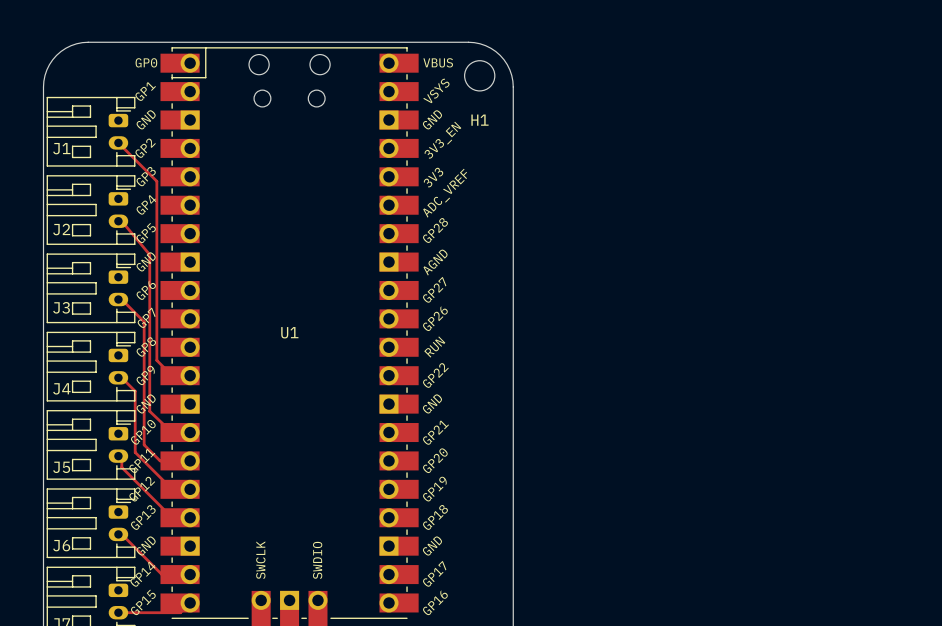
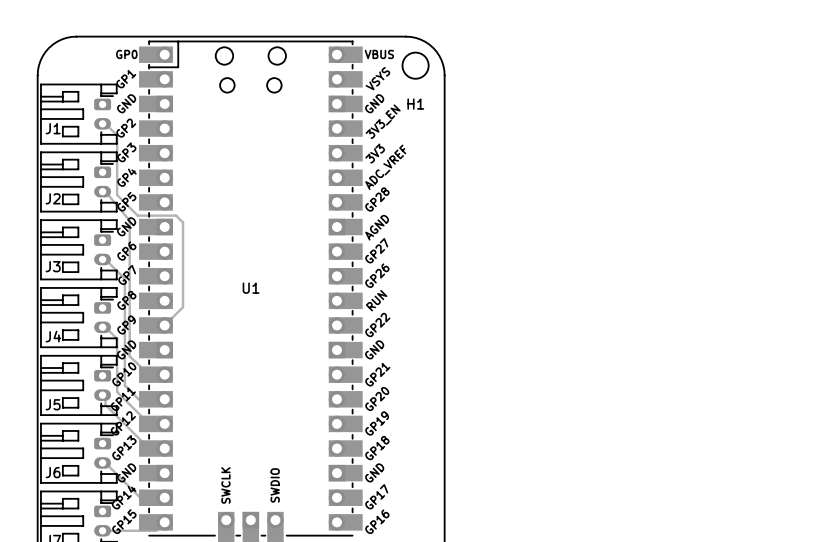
track: (118, 142) (156, 181) (156, 360) (172, 375) (190, 375) -> (105, 123) (117, 135) (117, 195) (137, 215) (176, 215) (183, 222) (183, 307) (164, 325)

